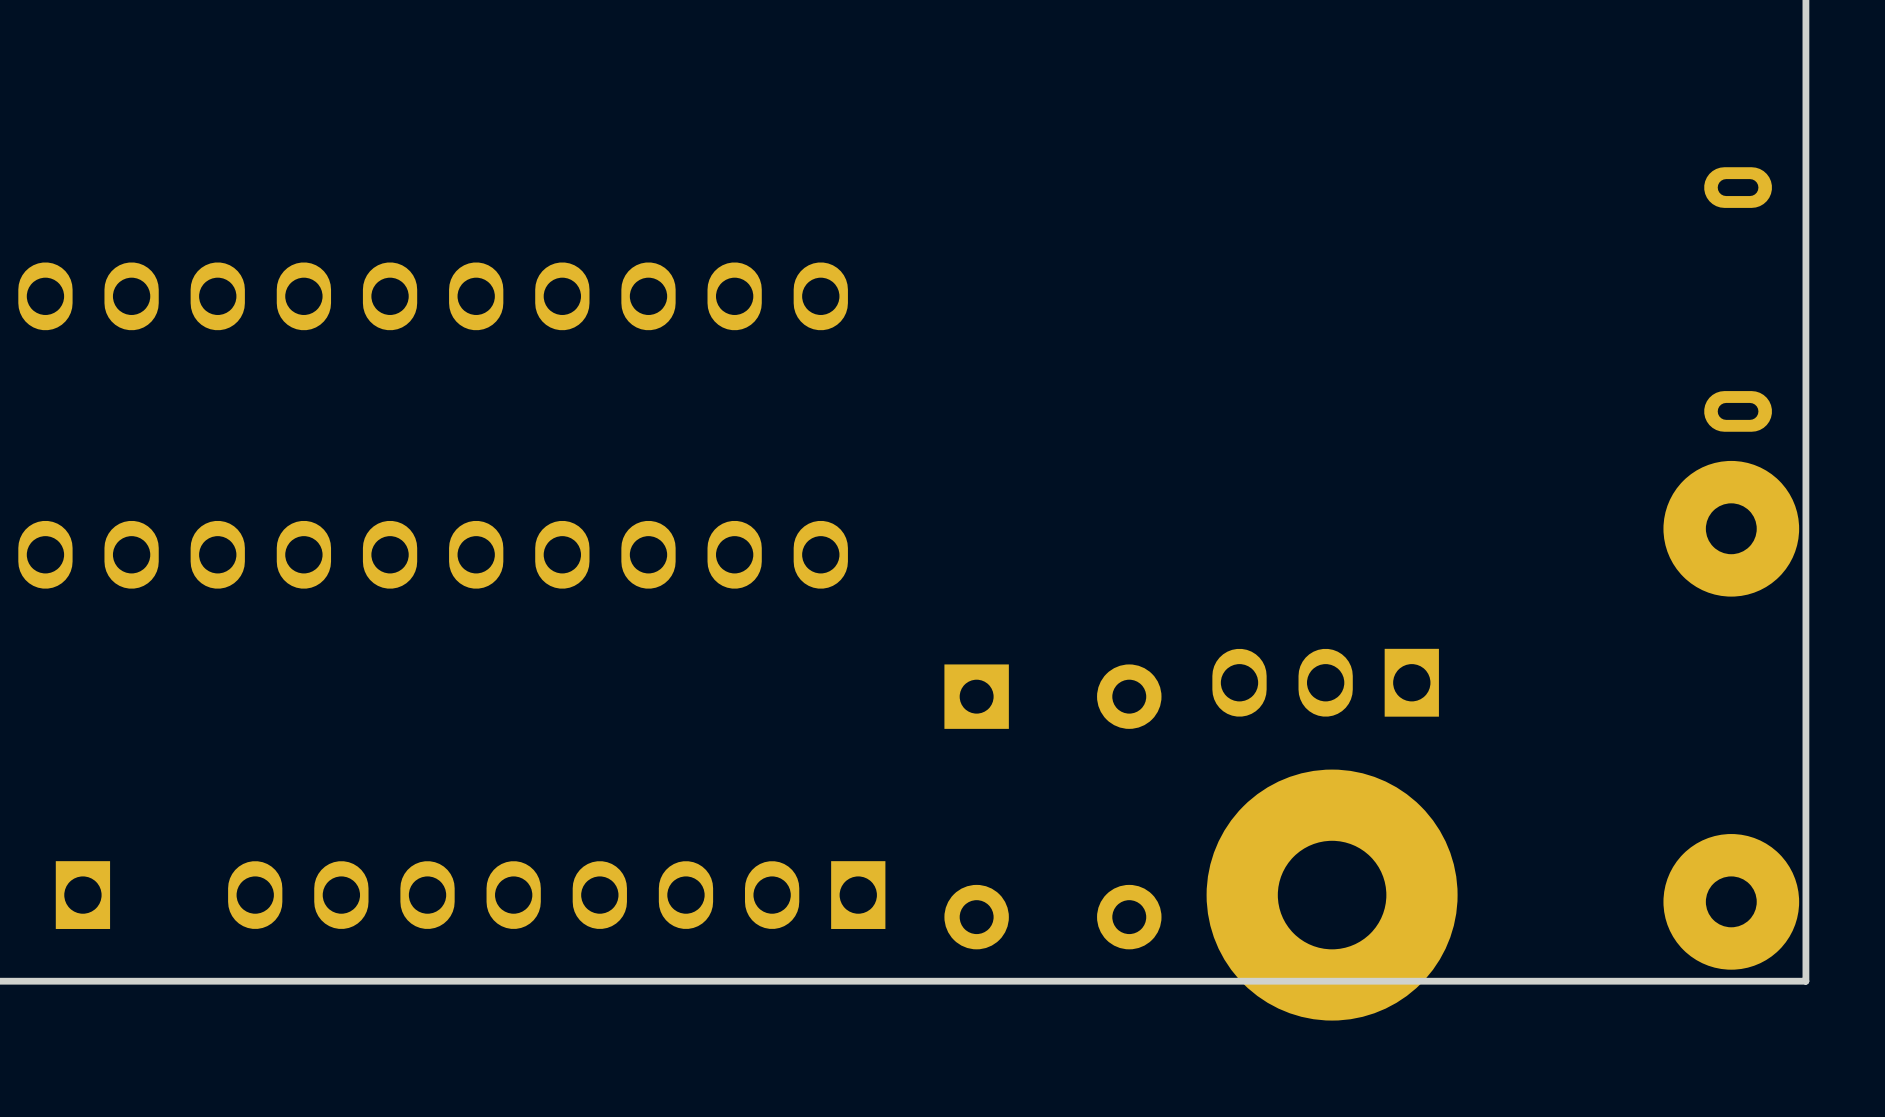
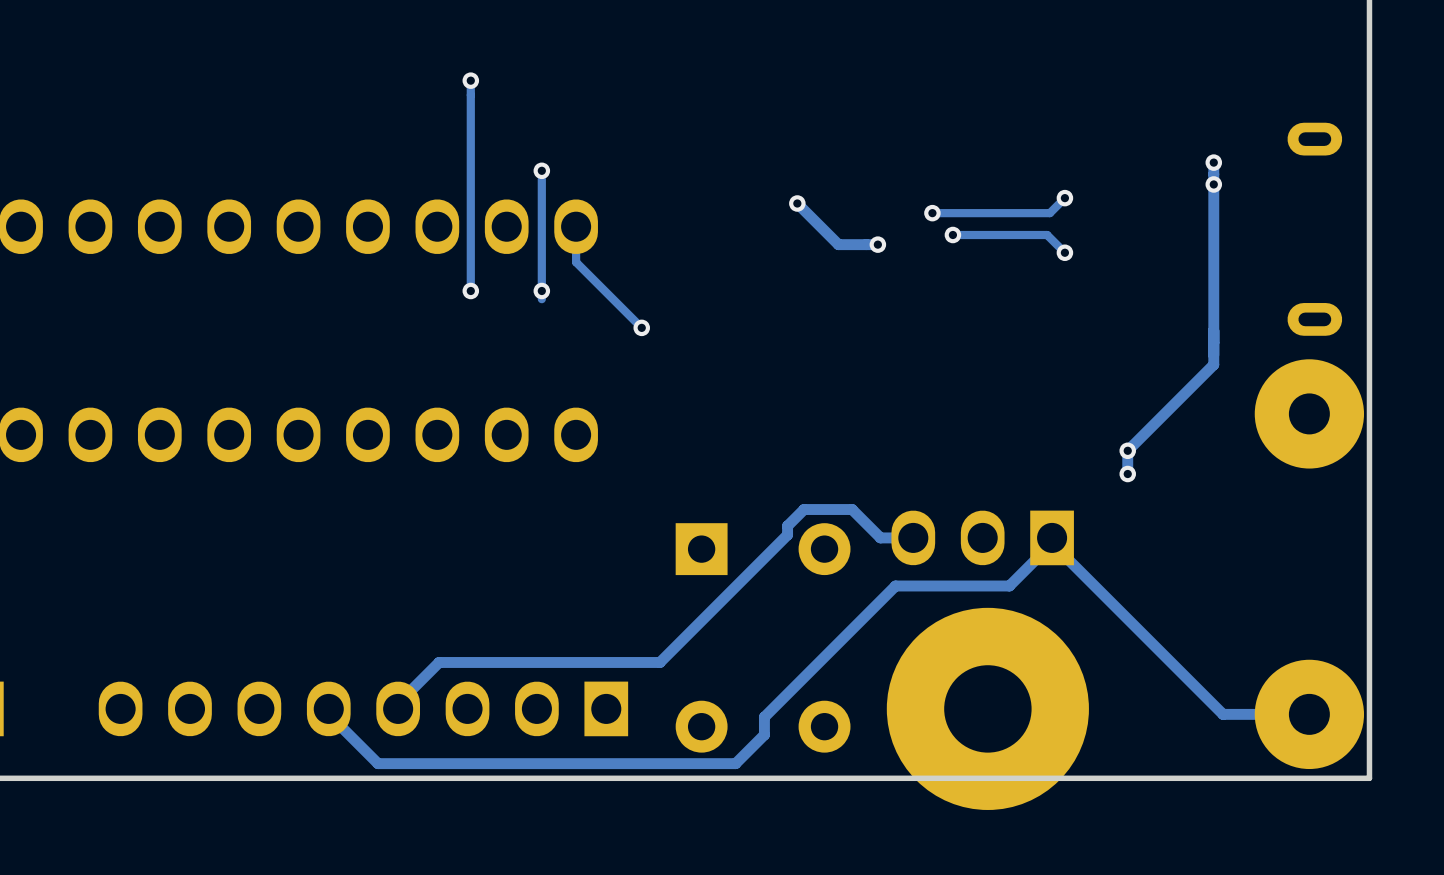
track: none -> (470, 80) (470, 290)
via: none -> (470, 80)
track: none -> (1213, 162) (1213, 364) (1127, 450) (1127, 475)
via: none -> (1213, 162)
via: none -> (541, 170)
track: none -> (541, 179) (541, 299)
via: none -> (1213, 184)
track: none -> (1064, 198) (1049, 213) (932, 213)
via: none -> (1064, 198)
track: none -> (797, 203) (838, 244) (877, 244)
via: none -> (797, 203)
via: none -> (932, 213)
track: none -> (576, 226) (576, 262) (641, 327)
track: none -> (952, 234) (1047, 234) (1064, 252)
via: none -> (952, 234)
via: none -> (877, 244)
via: none -> (1064, 252)
via: none -> (470, 290)
via: none -> (541, 290)
via: none -> (641, 327)
via: none -> (1127, 450)
via: none -> (1127, 474)
track: none -> (913, 537) (880, 537) (852, 509) (804, 509) (787, 525) (787, 534) (659, 662) (439, 662) (398, 703) (398, 708)
track: none -> (1052, 543) (1223, 714) (1309, 714)
track: none -> (1052, 543) (1009, 586) (895, 586) (764, 717) (764, 734) (735, 763) (378, 763) (328, 714) (328, 708)

